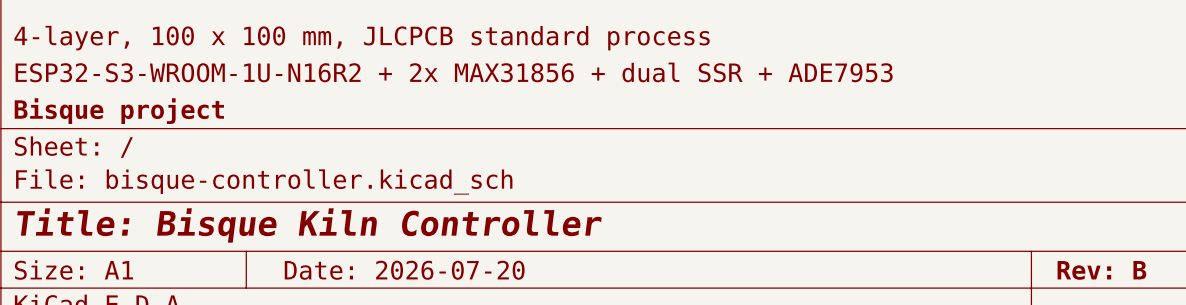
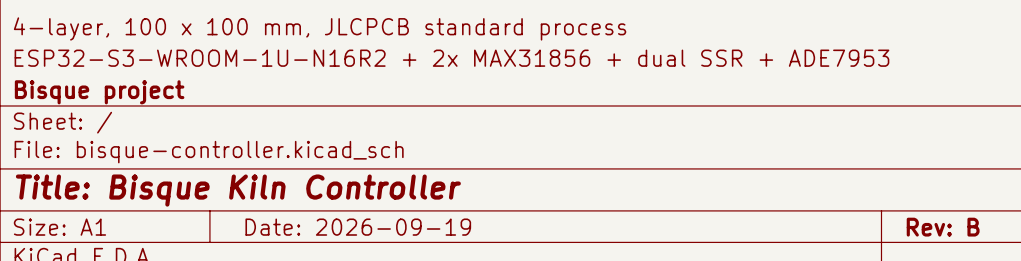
title block: Date: 2026-07-20 (404, 270) -> Date: 2026-09-19 (358, 227)

